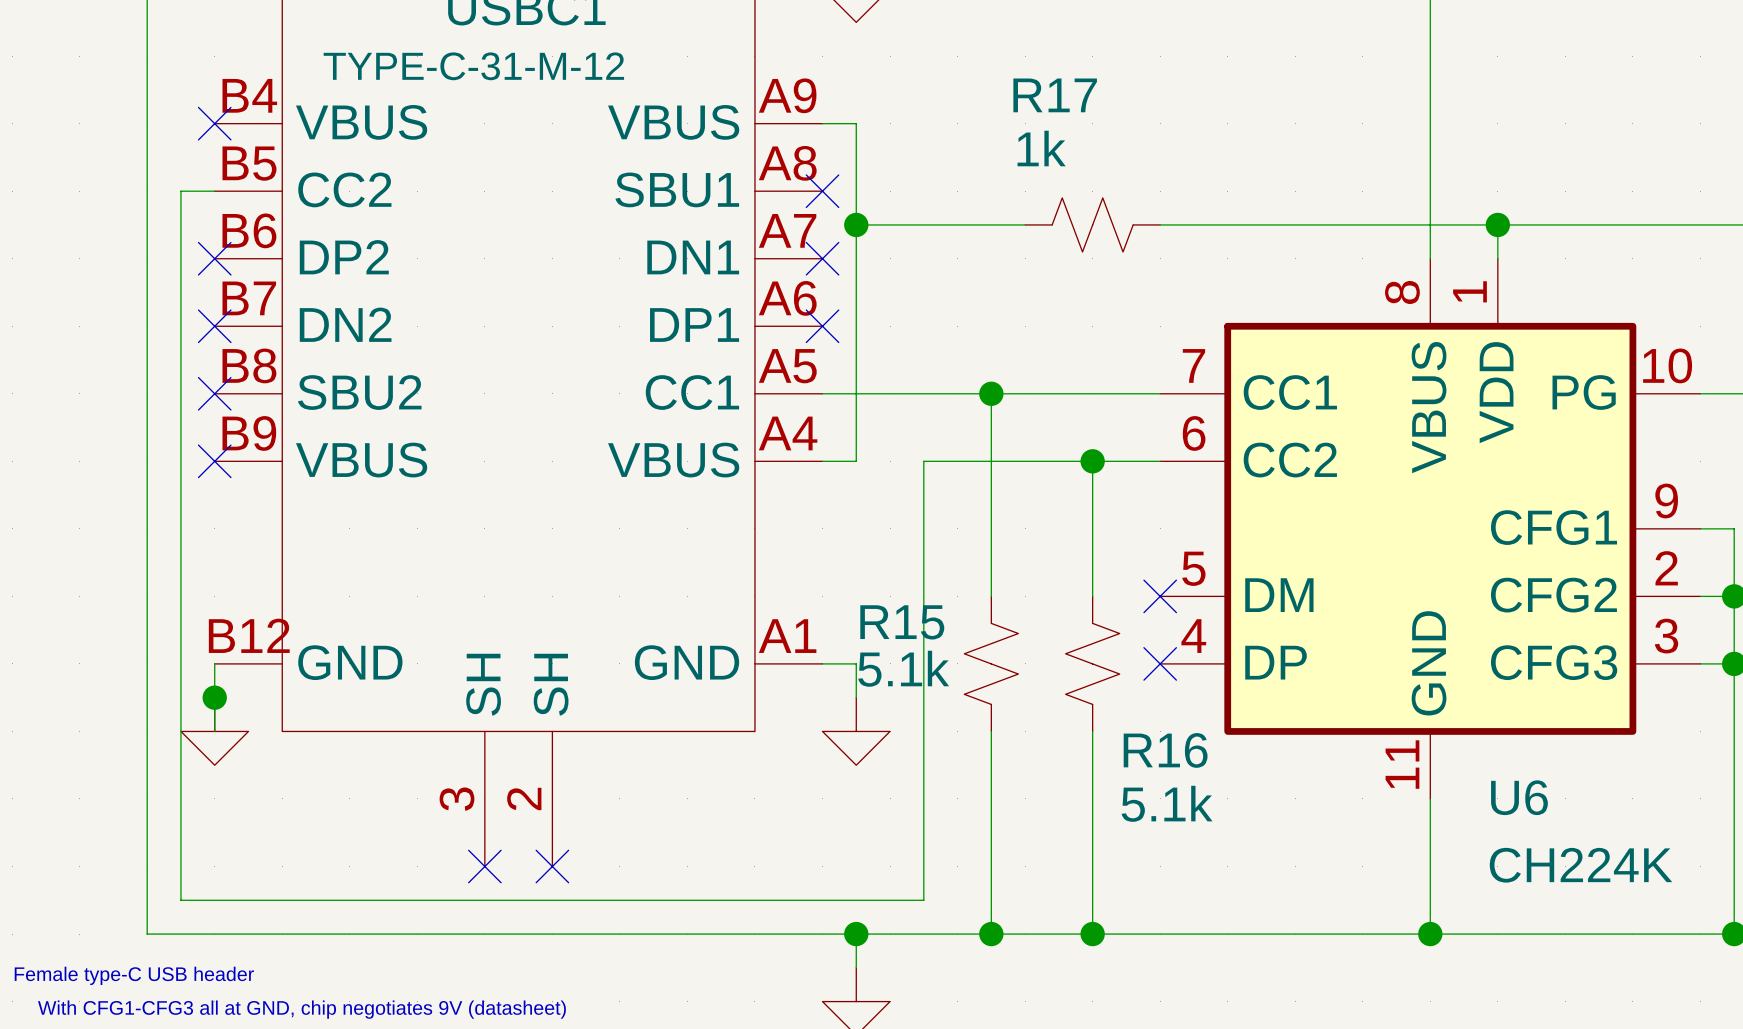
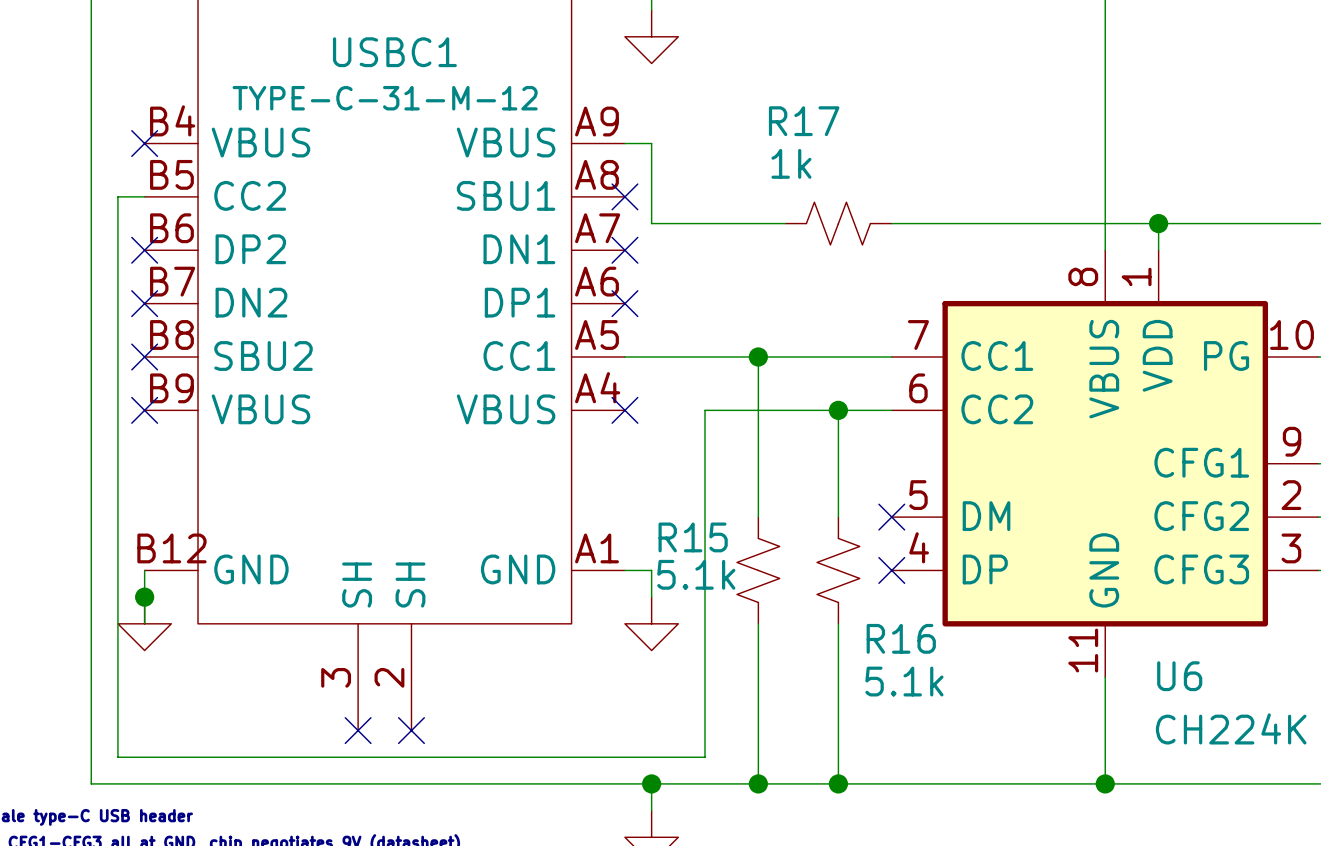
wire: (856, 224) (856, 461) (822, 461) -> none
junction: (856, 224) -> none
no-connect mark: none -> (624, 410)

